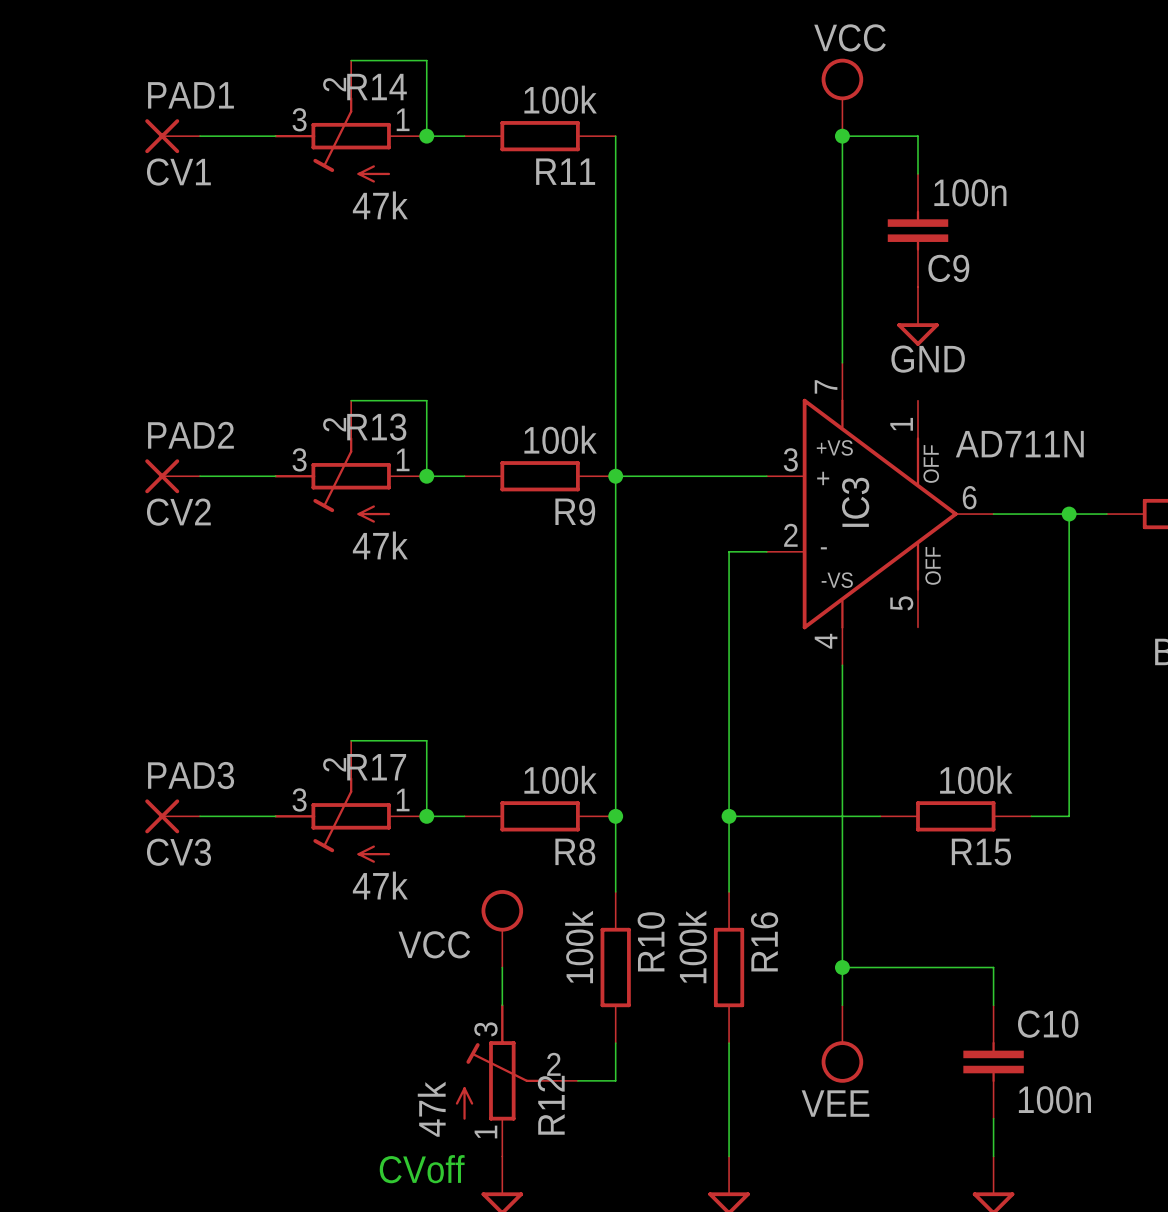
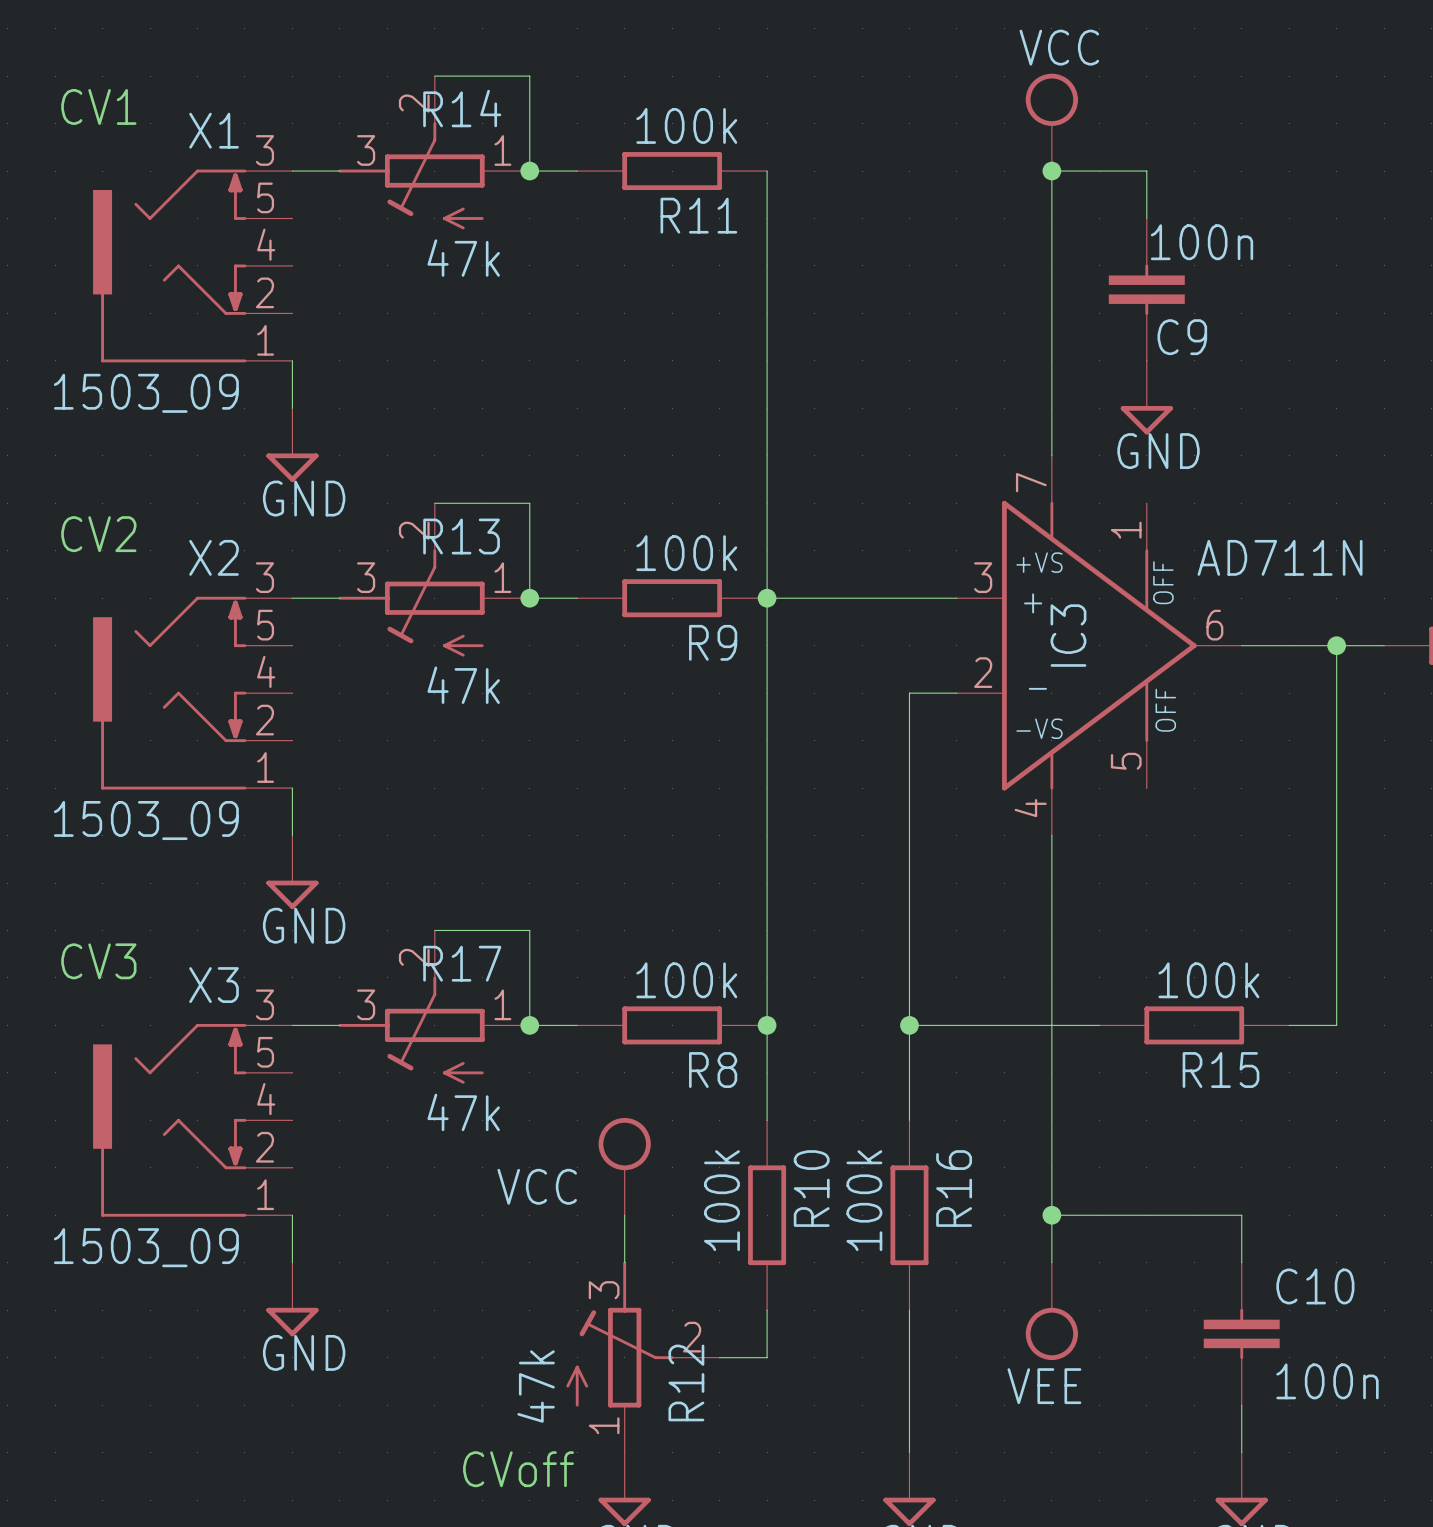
text: none -> CV1 (98, 106)
PAD1: CV1 (172, 136) -> none
X1: none -> 1503_09 (192, 265)
wire: none -> (292, 360) (292, 408)
power symbol: none -> GND (292, 445)
text: none -> CV2 (98, 534)
PAD2: CV2 (172, 476) -> none
X2: none -> 1503_09 (192, 693)
wire: none -> (292, 788) (292, 835)
power symbol: none -> GND (292, 872)
text: none -> CV3 (98, 961)
PAD3: CV3 (172, 816) -> none
X3: none -> 1503_09 (192, 1120)
wire: none -> (292, 1215) (292, 1262)
power symbol: none -> GND (292, 1299)

